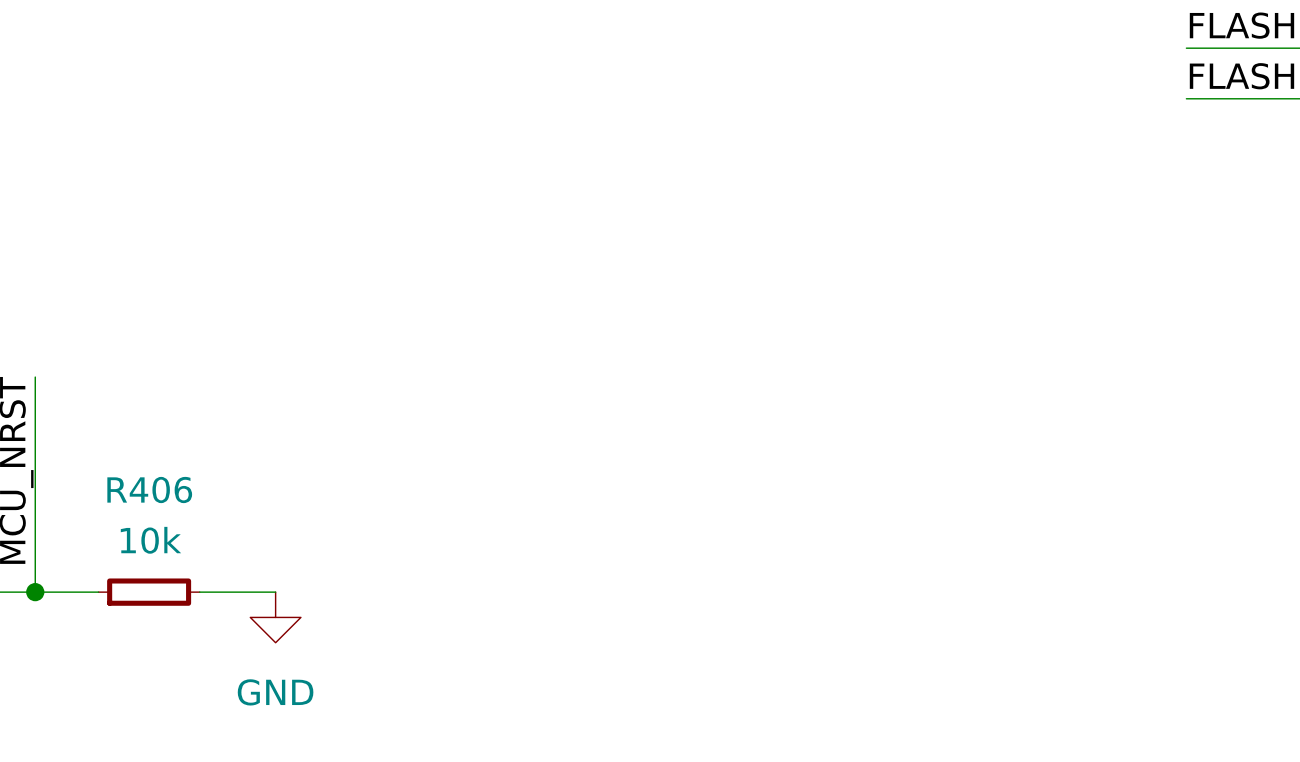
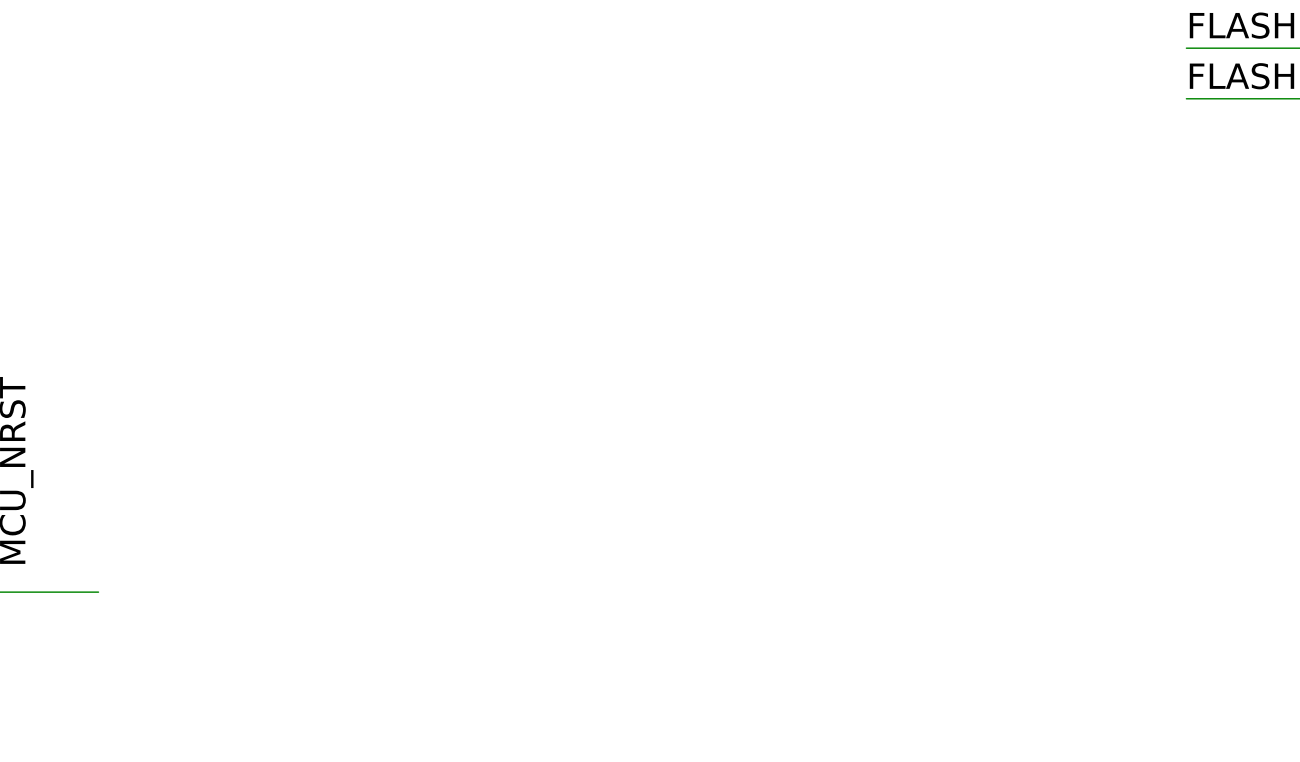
wire: (35, 377) (35, 592) -> none
junction: (35, 592) -> none
R406: 10k (149, 592) -> none
wire: (199, 592) (275, 592) -> none
power symbol: GND (275, 617) -> none

